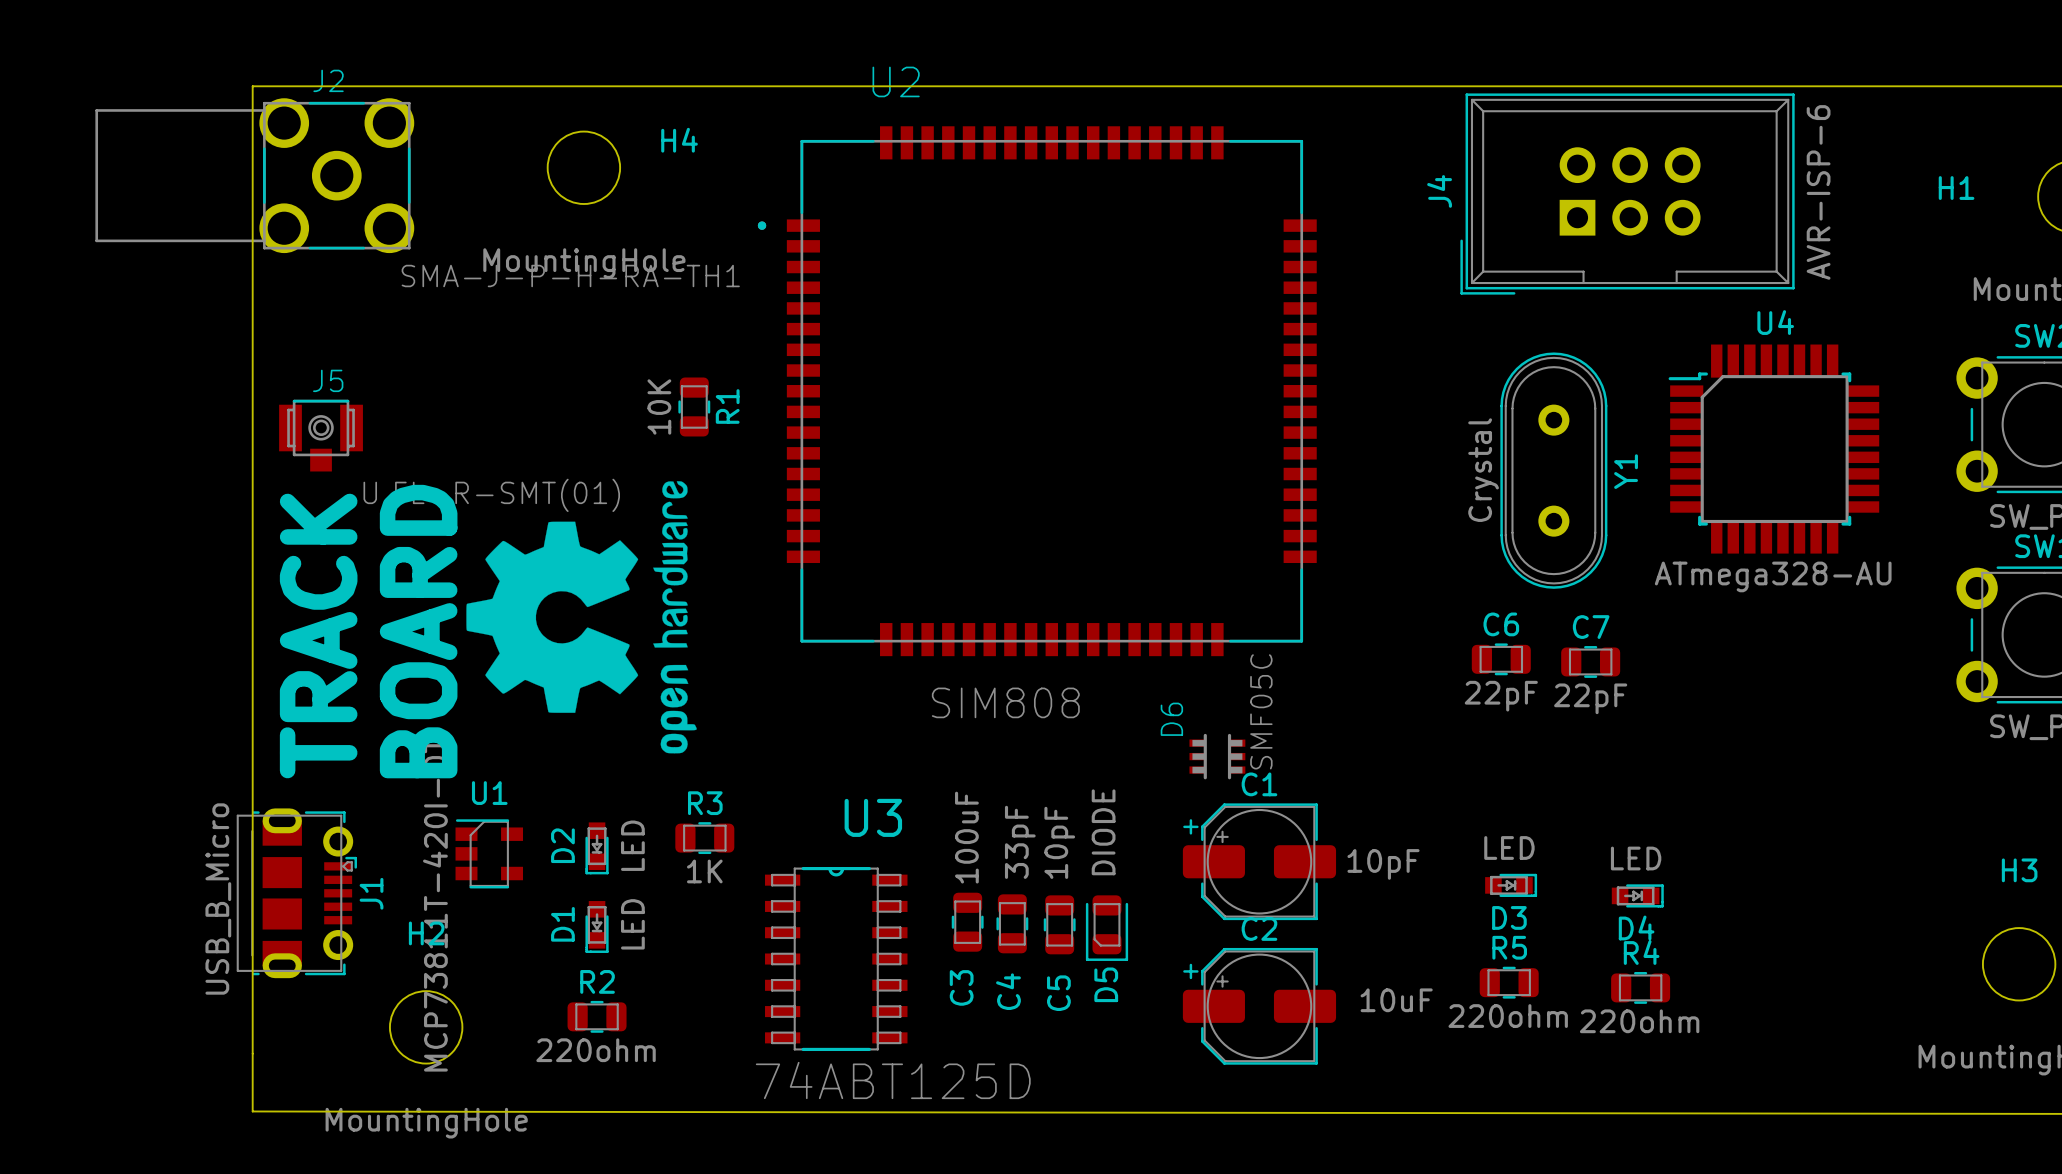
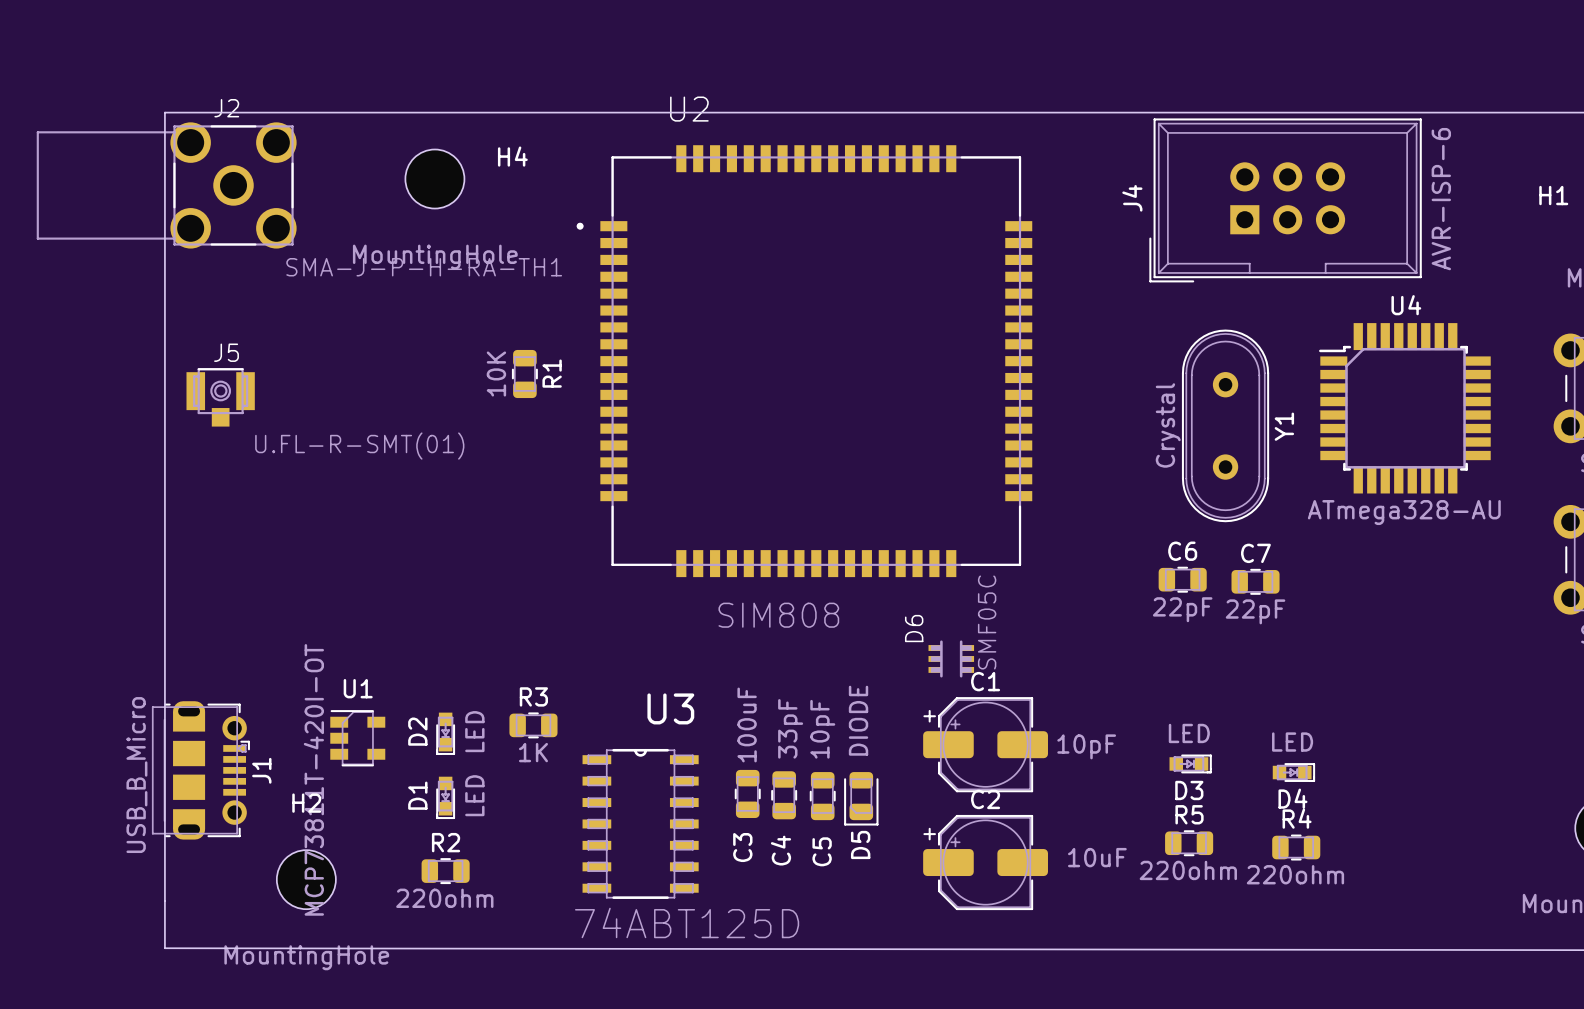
drawing: [466, 481, 697, 754] -> none
text: BOARD (418, 631) -> none
text: TRACK (318, 636) -> none

